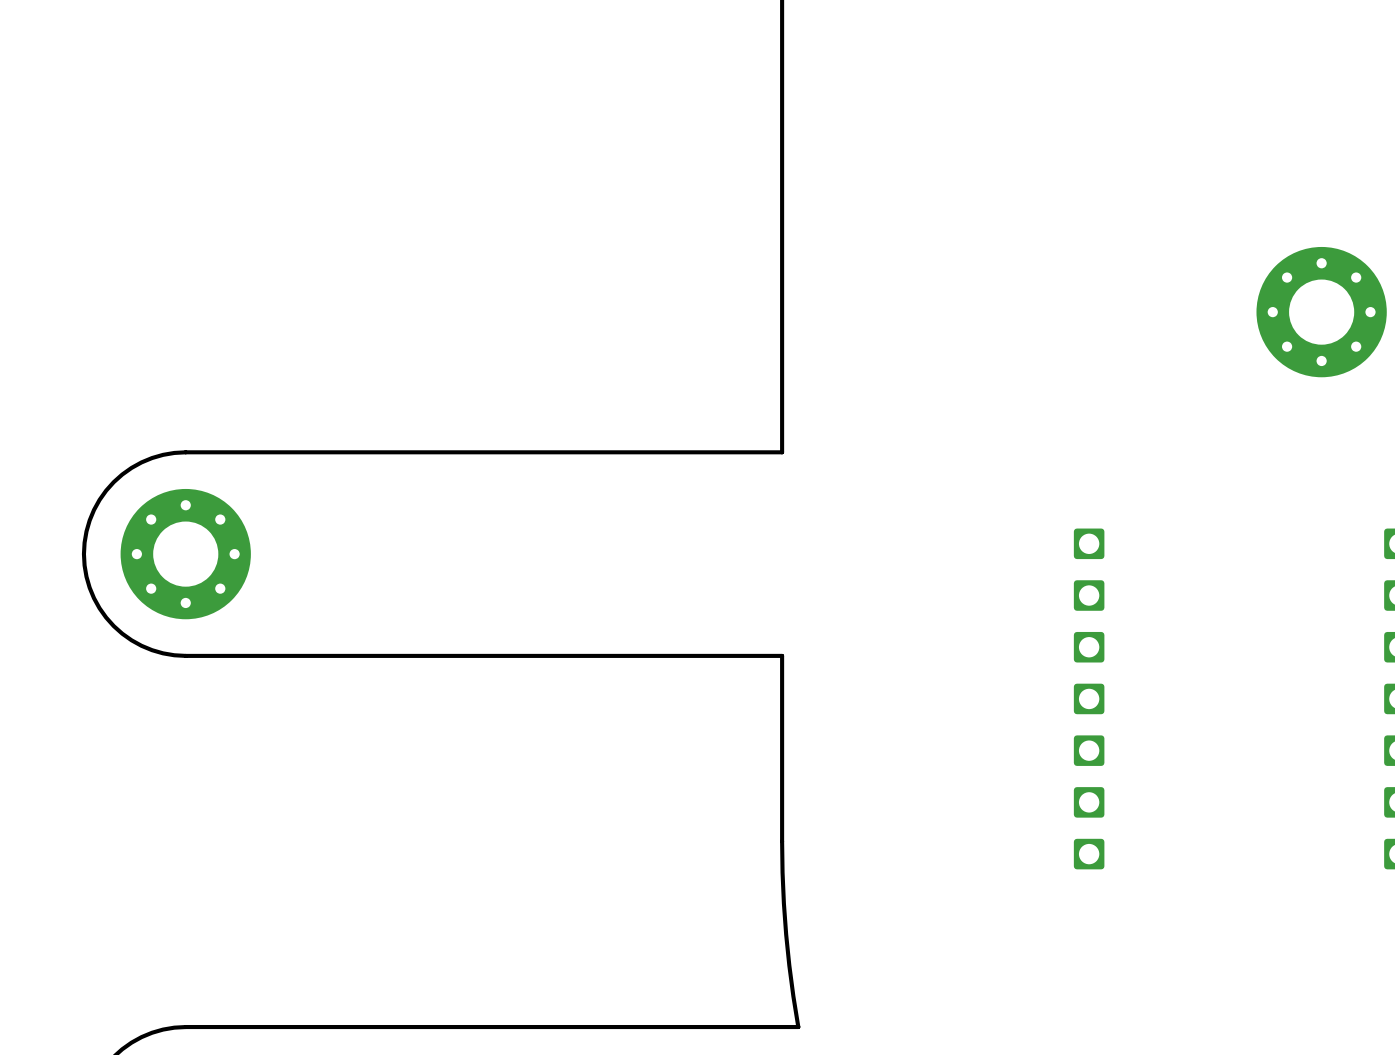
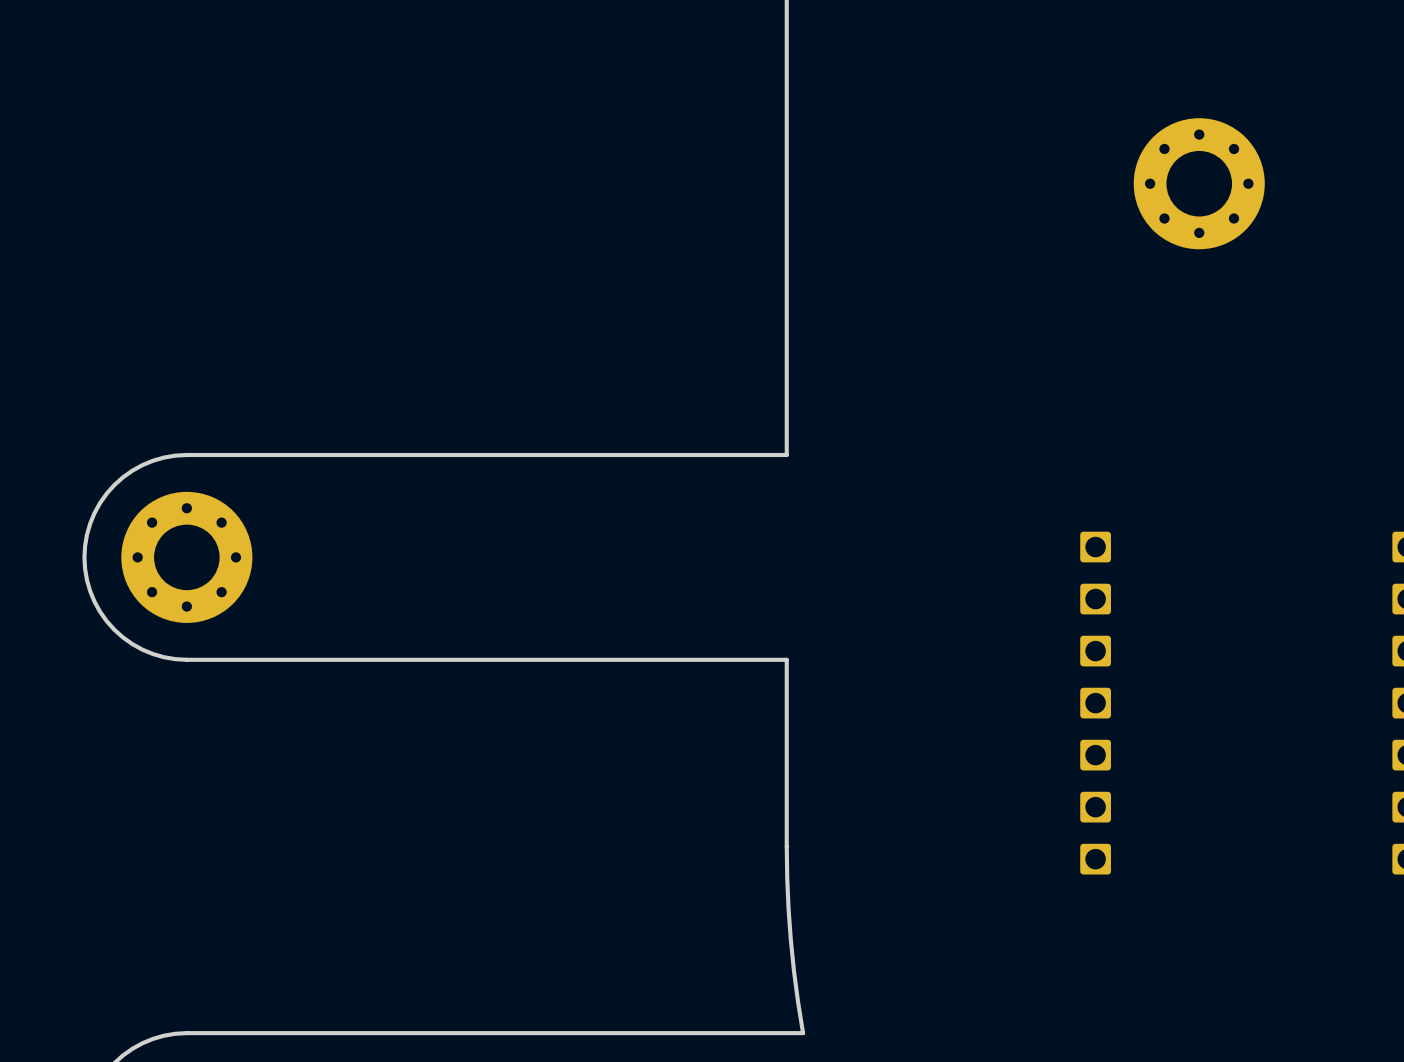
part position: (1321, 312) -> (1199, 183)

